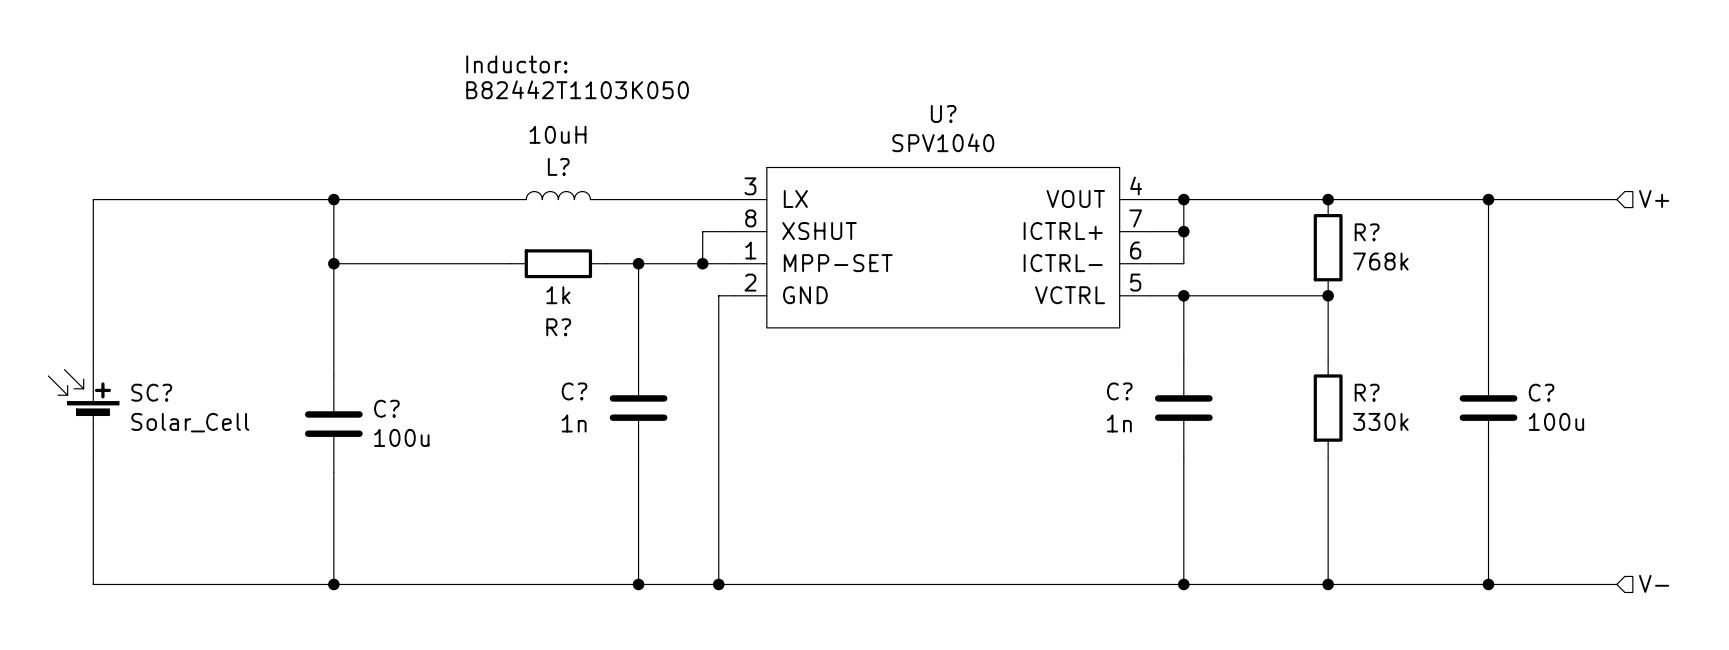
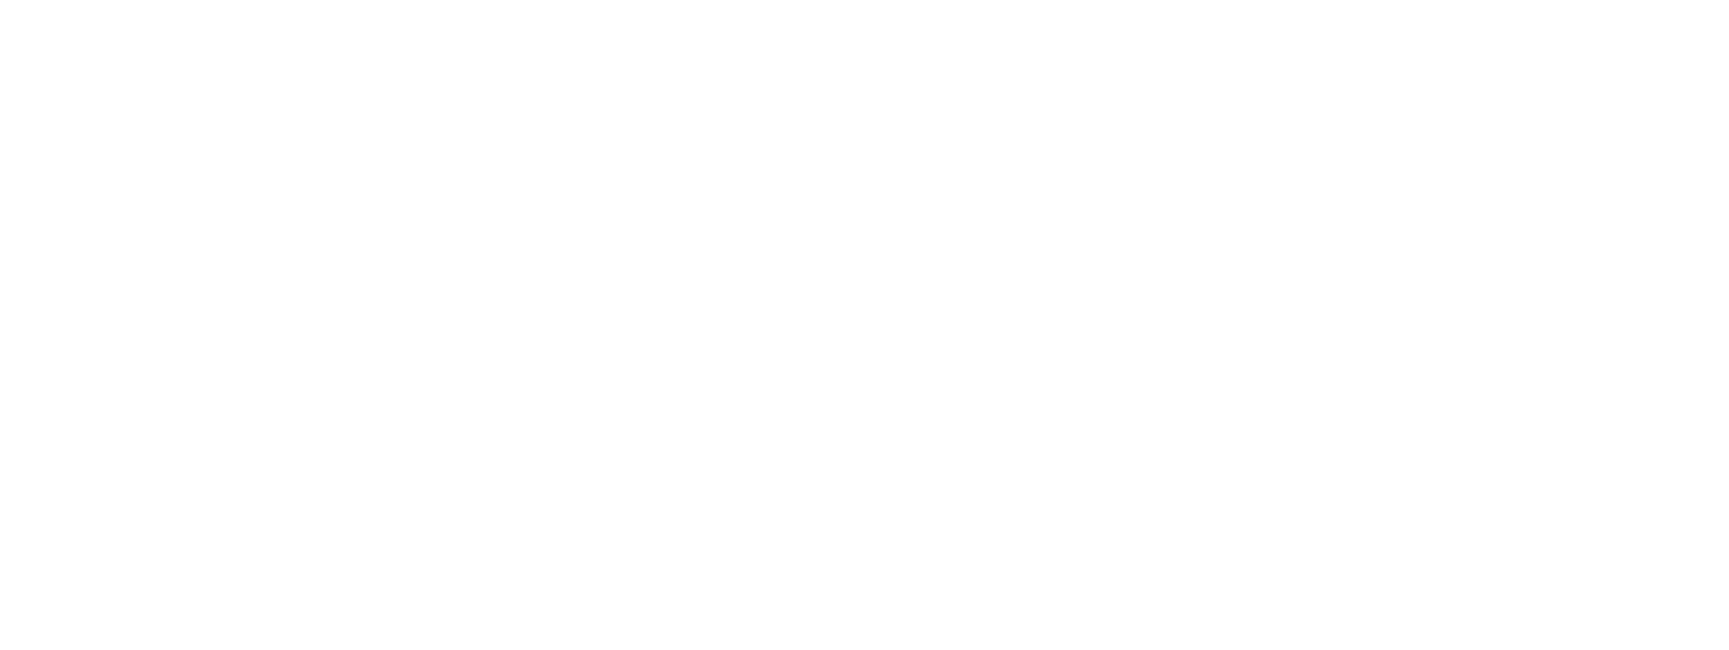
text: Inductor: (516, 64) -> none
text: B82442T1103K050 (577, 89) -> none
L?: 10uH (558, 195) -> none
hierarchical label: V+ (1654, 198) -> none
wire: (333, 199) (333, 375) -> none
junction: (333, 199) -> none
wire: (510, 199) (93, 199) (93, 359) -> none
wire: (606, 199) (734, 199) -> none
wire: (1151, 199) (1616, 199) -> none
wire: (1183, 199) (1183, 263) (1151, 263) -> none
junction: (1183, 199) -> none
junction: (1328, 199) -> none
wire: (1488, 199) (1488, 359) -> none
junction: (1488, 199) -> none
wire: (734, 231) (702, 231) (702, 263) -> none
wire: (1151, 231) (1183, 231) -> none
junction: (1183, 231) -> none
U?: SPV1040 (943, 247) -> none
R?: 768k (1328, 247) -> none
wire: (333, 263) (510, 263) -> none
junction: (333, 263) -> none
R?: 1k (558, 263) -> none
wire: (606, 263) (734, 263) -> none
wire: (638, 263) (638, 359) -> none
junction: (638, 263) -> none
junction: (702, 263) -> none
wire: (734, 295) (718, 295) (718, 584) -> none
wire: (1151, 295) (1328, 295) (1328, 359) -> none
wire: (1183, 295) (1183, 359) -> none
junction: (1183, 295) -> none
junction: (1328, 295) -> none
SC?: Solar_Cell (83, 408) -> none
C?: 1n (638, 408) -> none
C?: 1n (1183, 408) -> none
R?: 330k (1328, 408) -> none
C?: 100u (1488, 408) -> none
C?: 100u (333, 424) -> none
wire: (93, 456) (93, 584) (1616, 584) -> none
wire: (638, 456) (638, 584) -> none
wire: (1183, 456) (1183, 584) -> none
wire: (1328, 456) (1328, 584) -> none
wire: (1488, 456) (1488, 584) -> none
wire: (333, 472) (333, 584) -> none
hierarchical label: V- (1654, 583) -> none
junction: (333, 584) -> none
junction: (638, 584) -> none
junction: (718, 584) -> none
junction: (1183, 584) -> none
junction: (1328, 584) -> none
junction: (1488, 584) -> none

